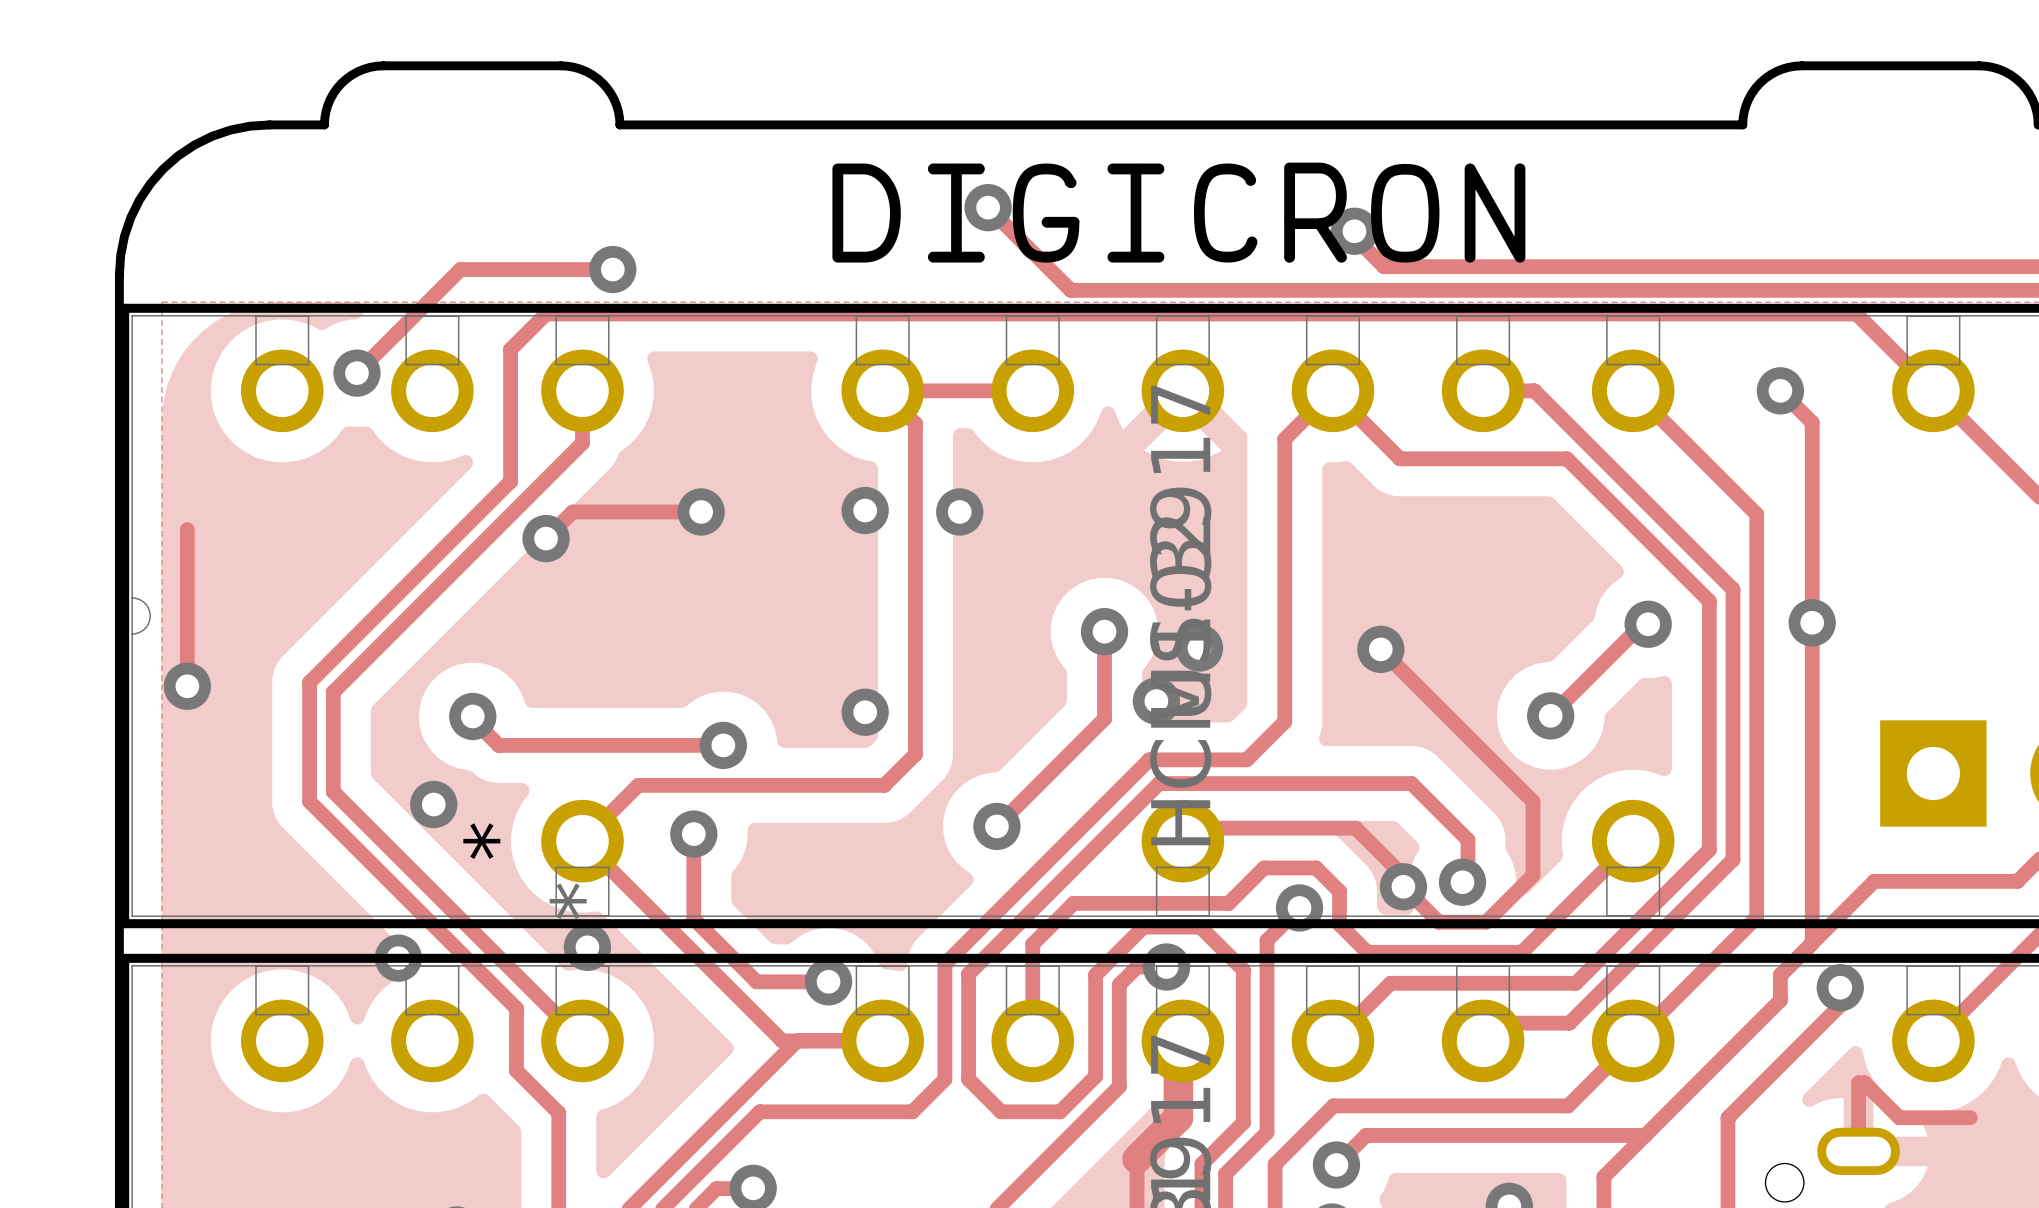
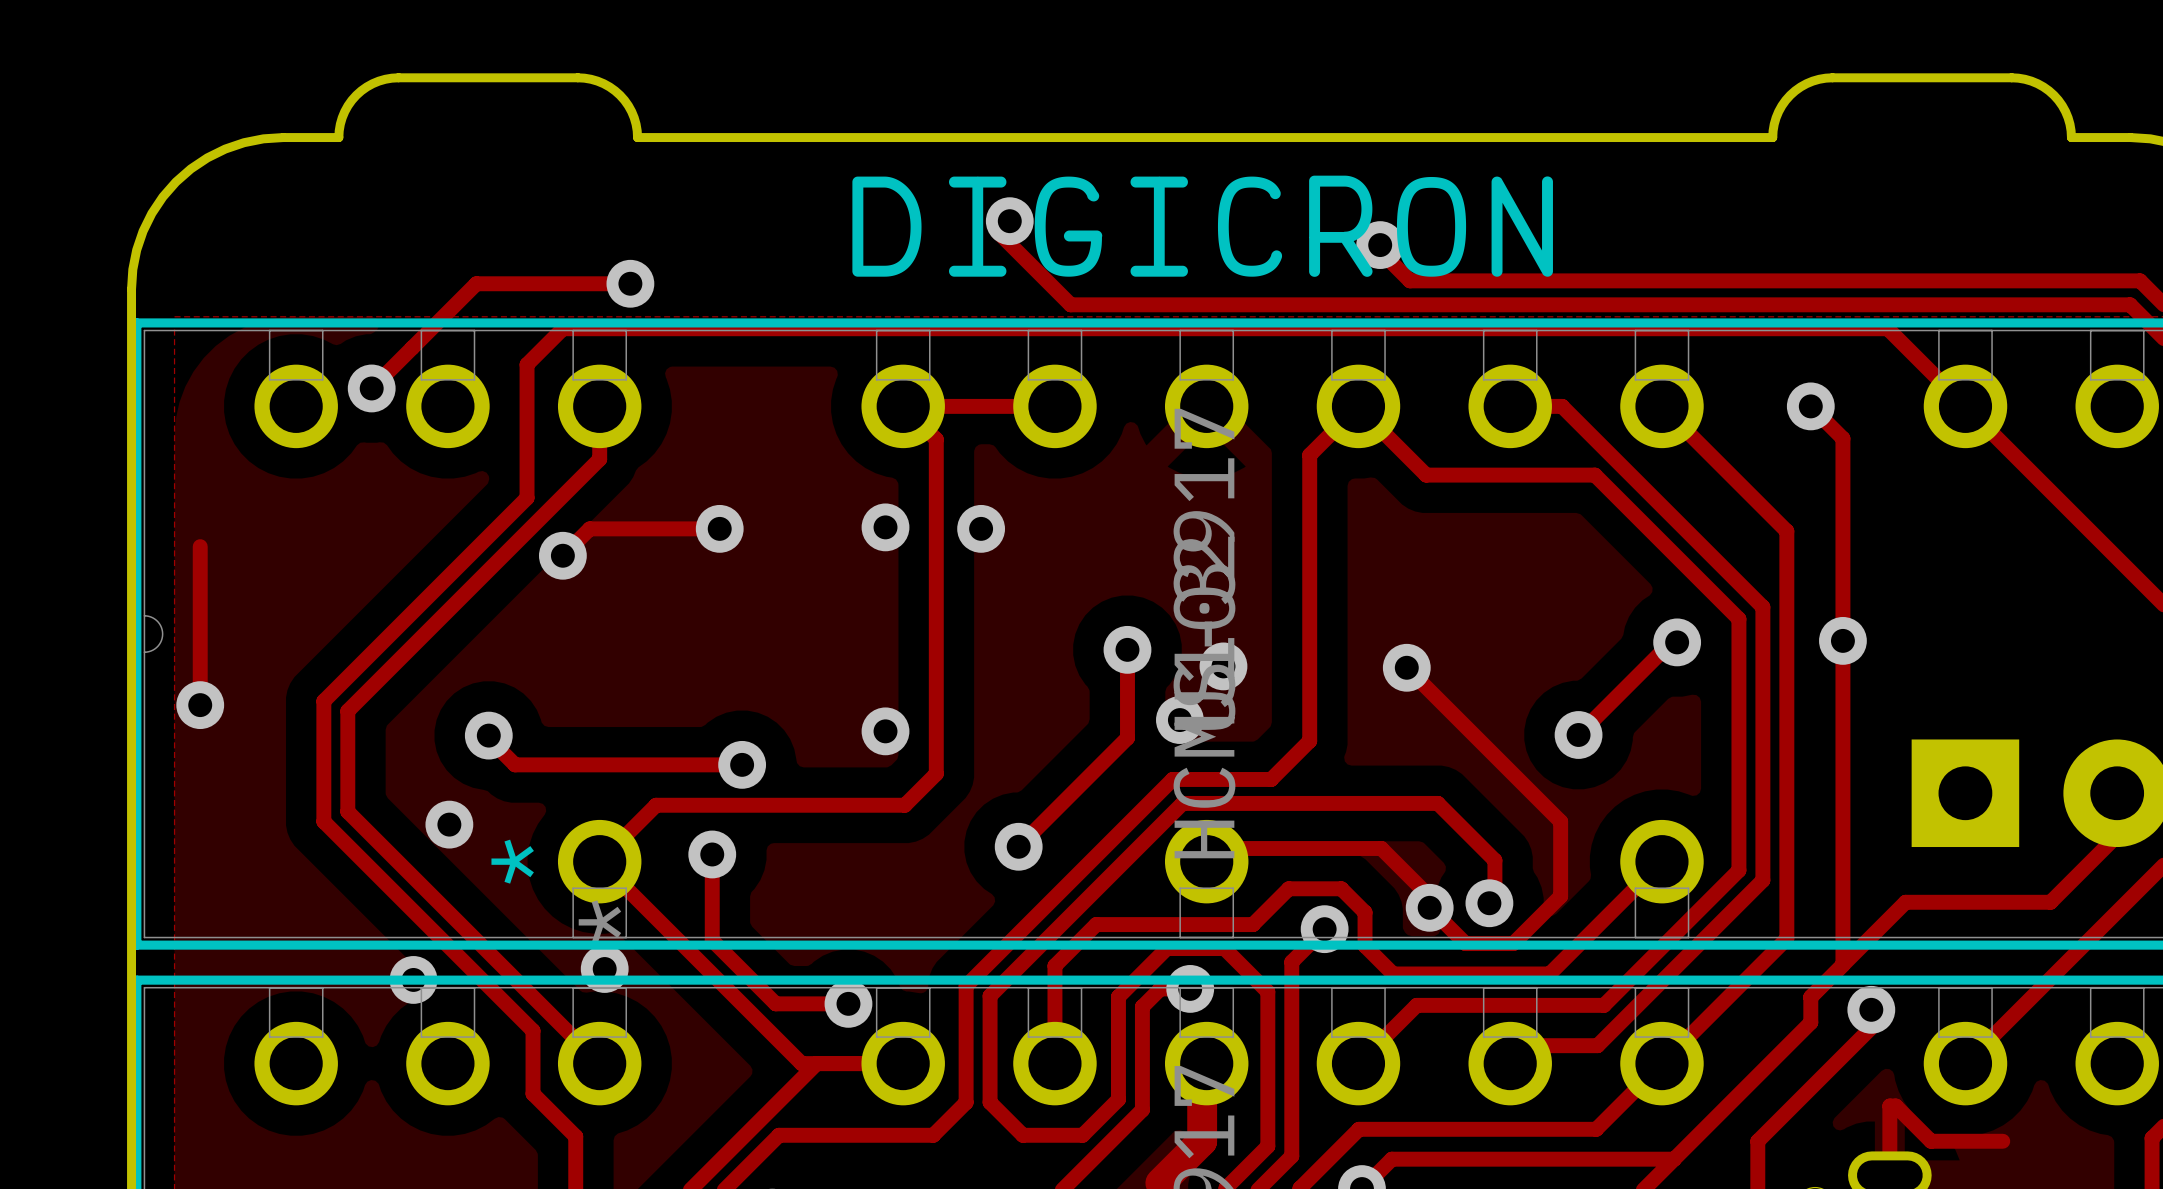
track: (977, 218) (998, 218) (1070, 290) -> (999, 231) (1070, 304) (1093, 304)

